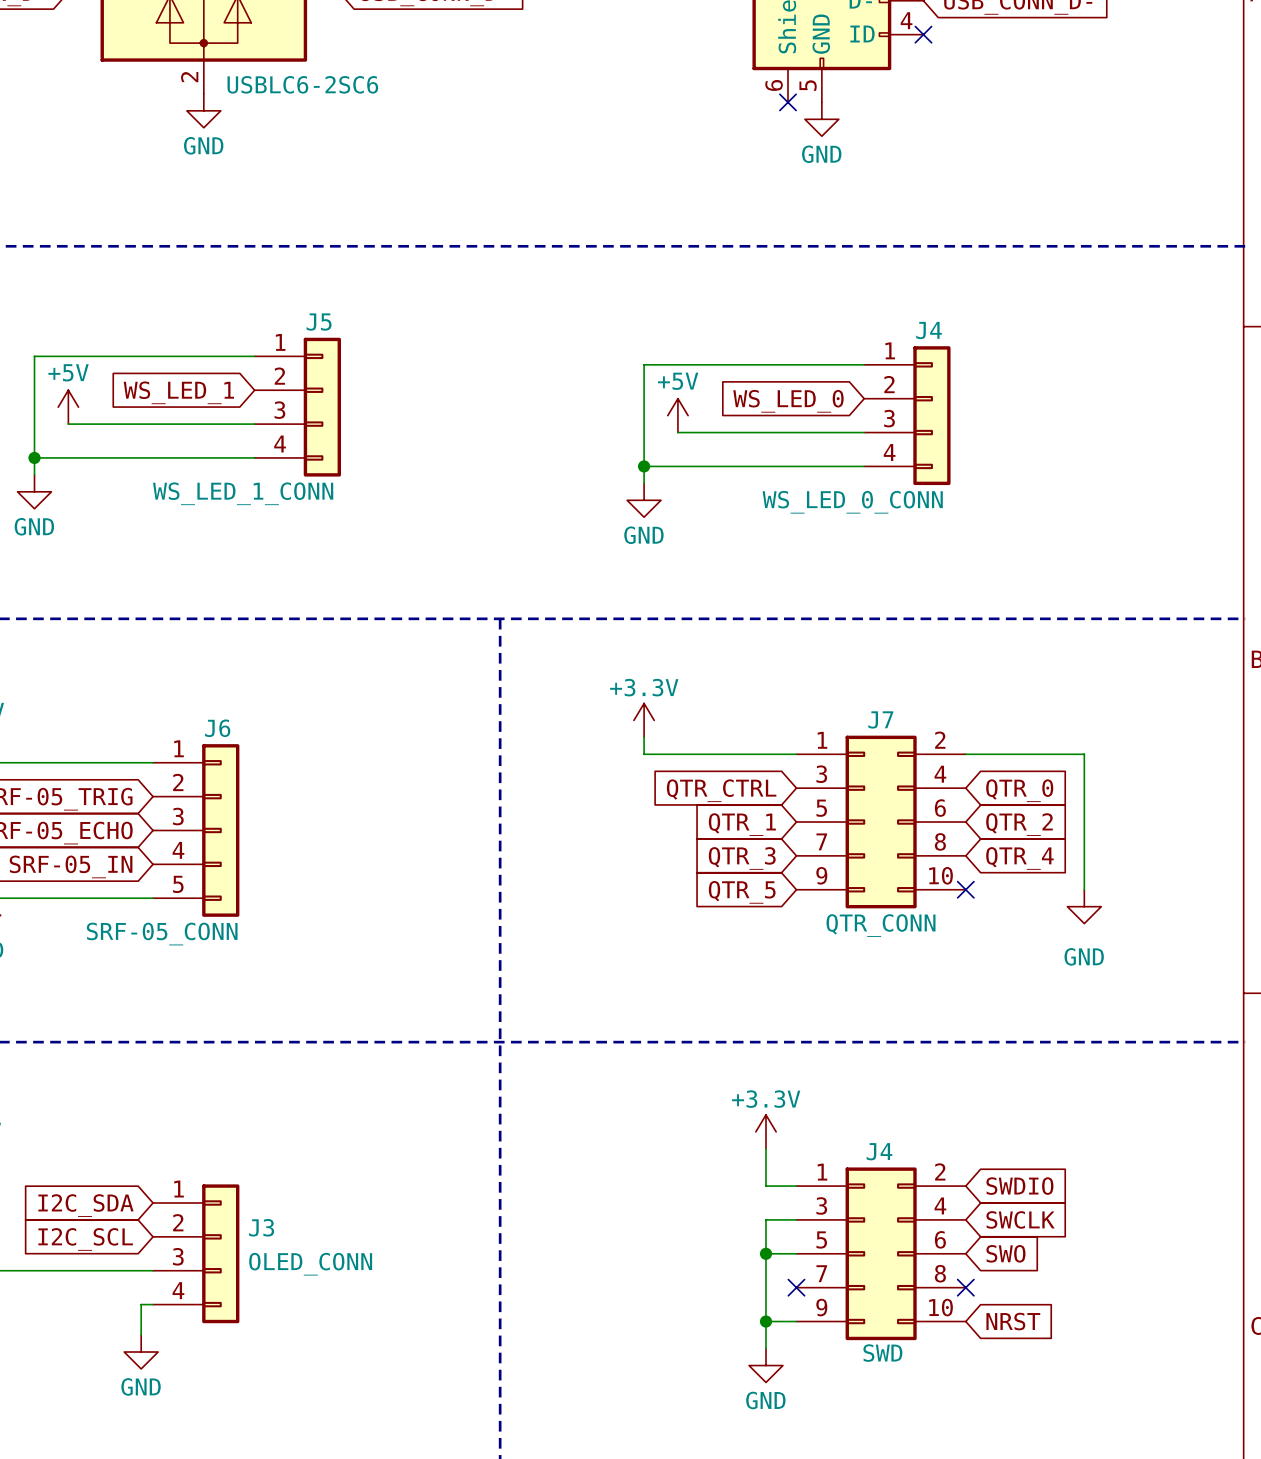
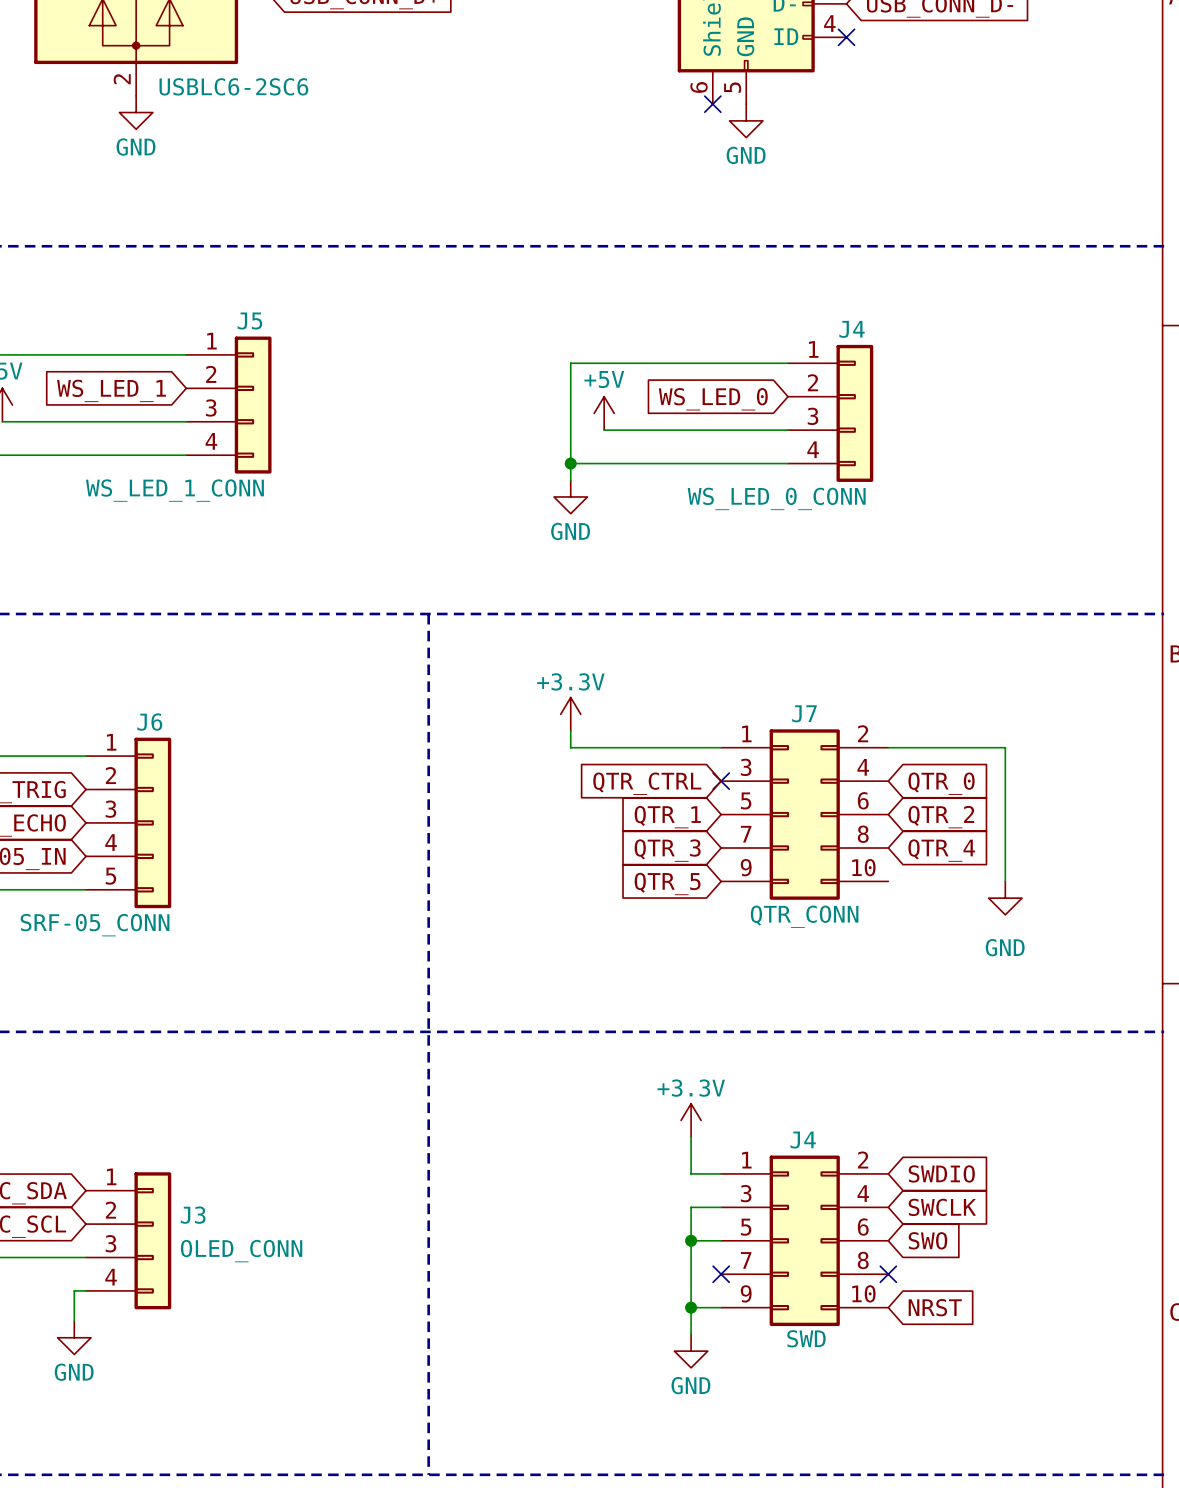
no-connect mark: none -> (721, 781)
no-connect mark: (965, 889) -> none

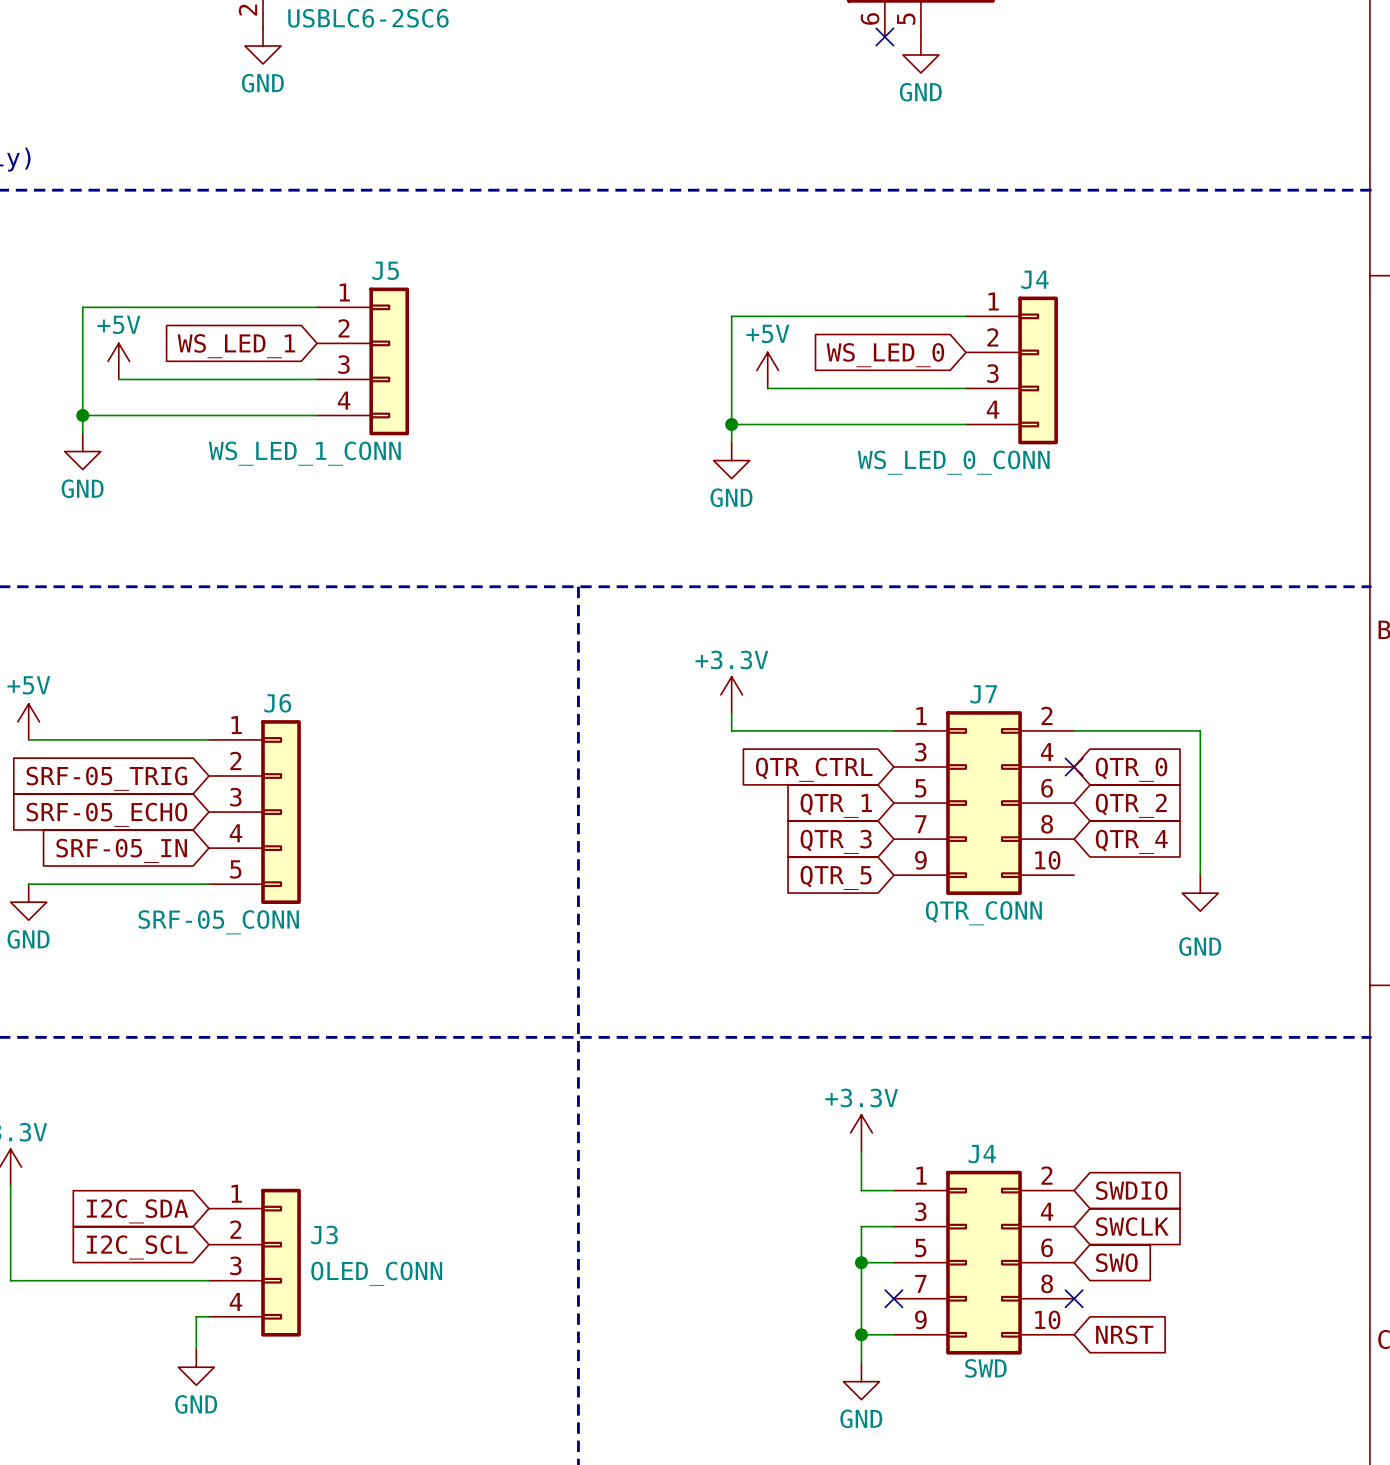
no-connect mark: (721, 781) -> none
no-connect mark: none -> (1074, 766)

